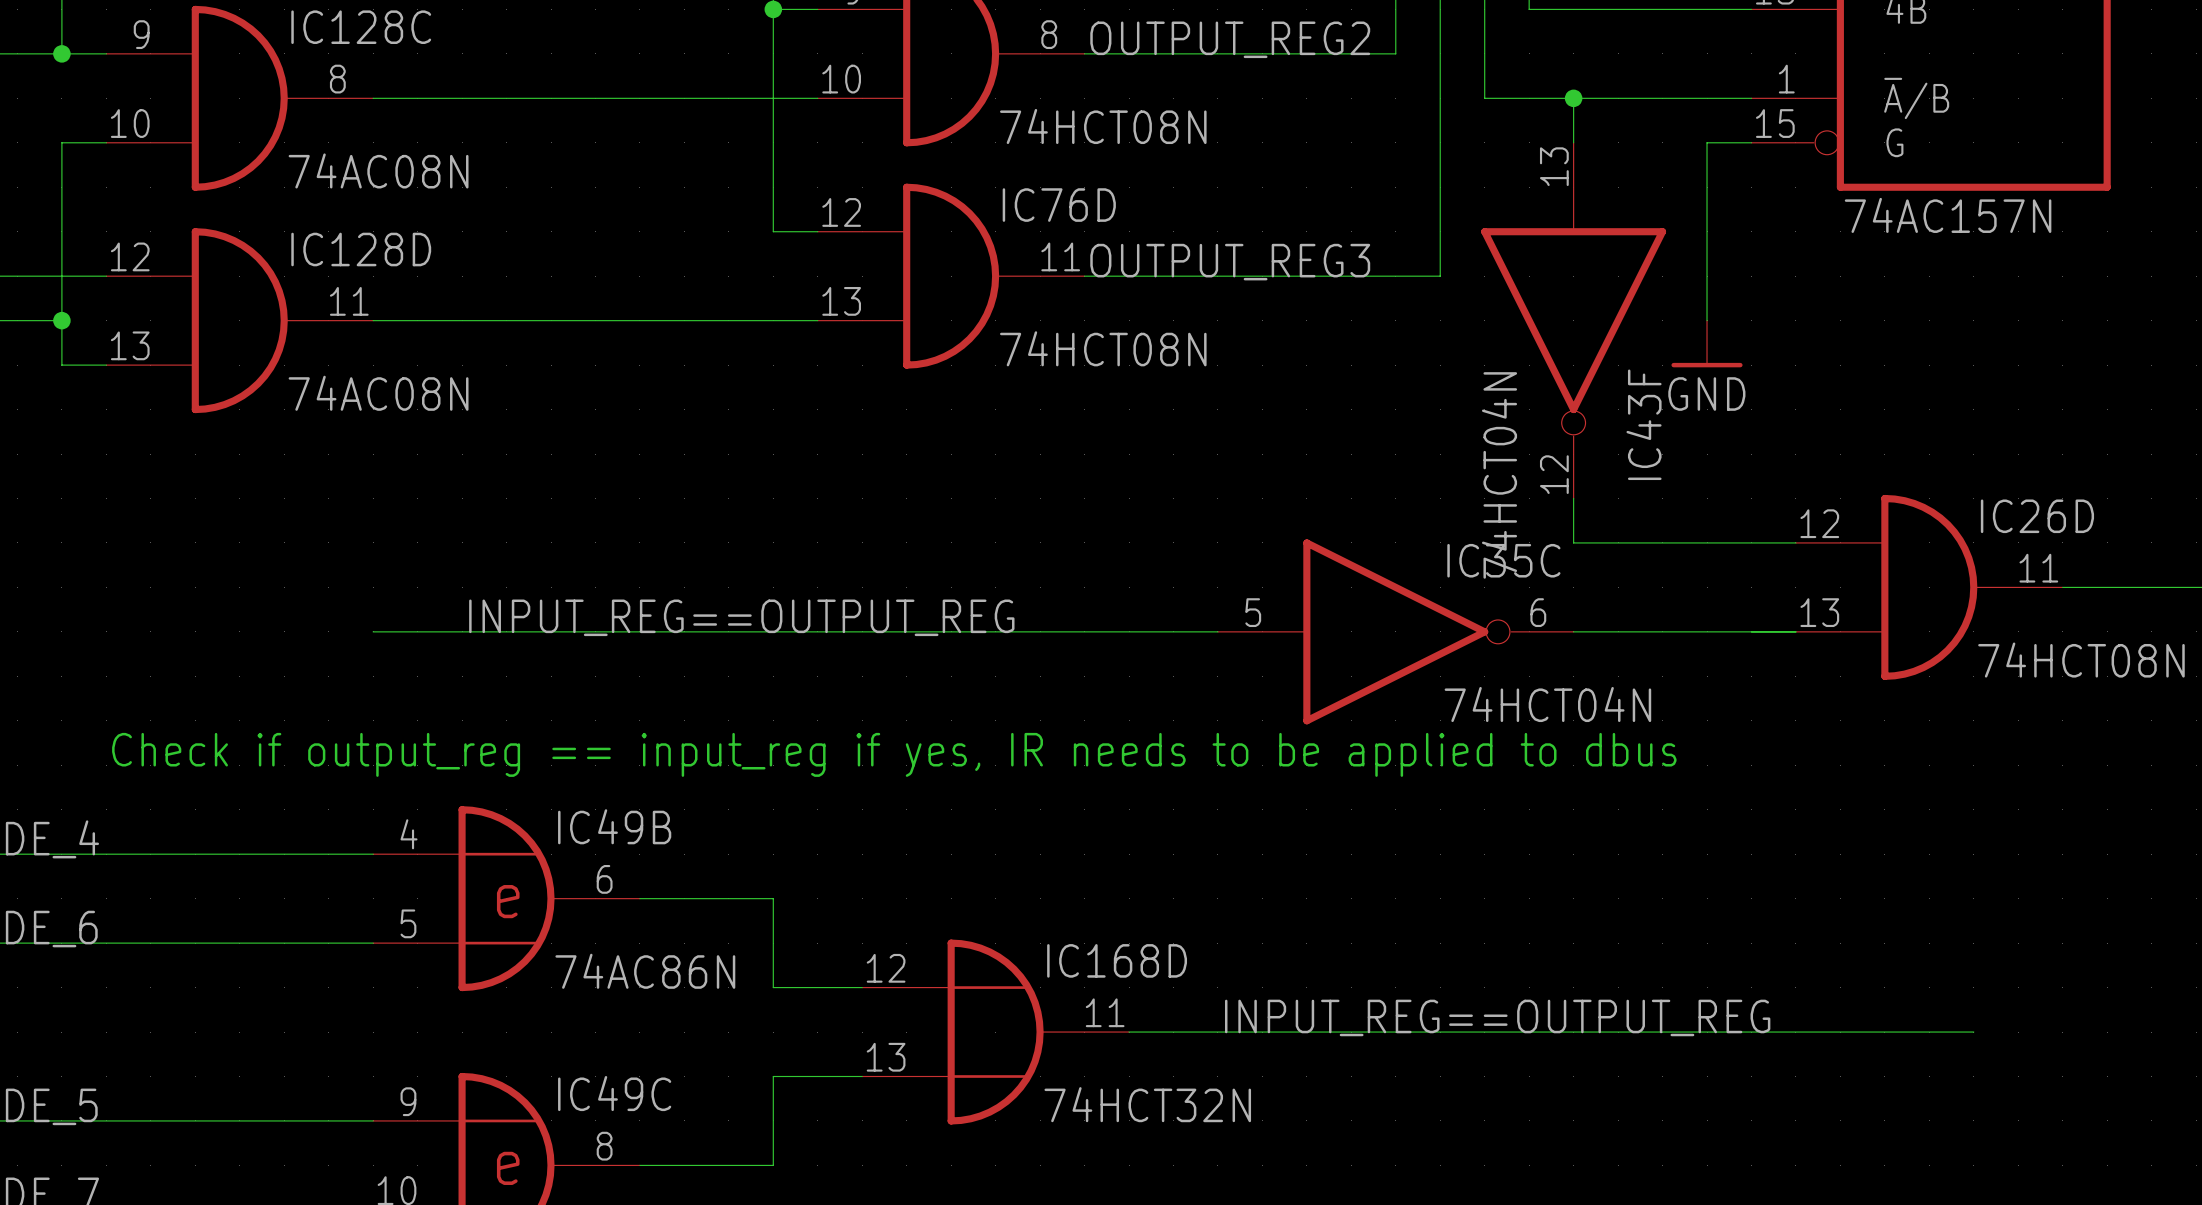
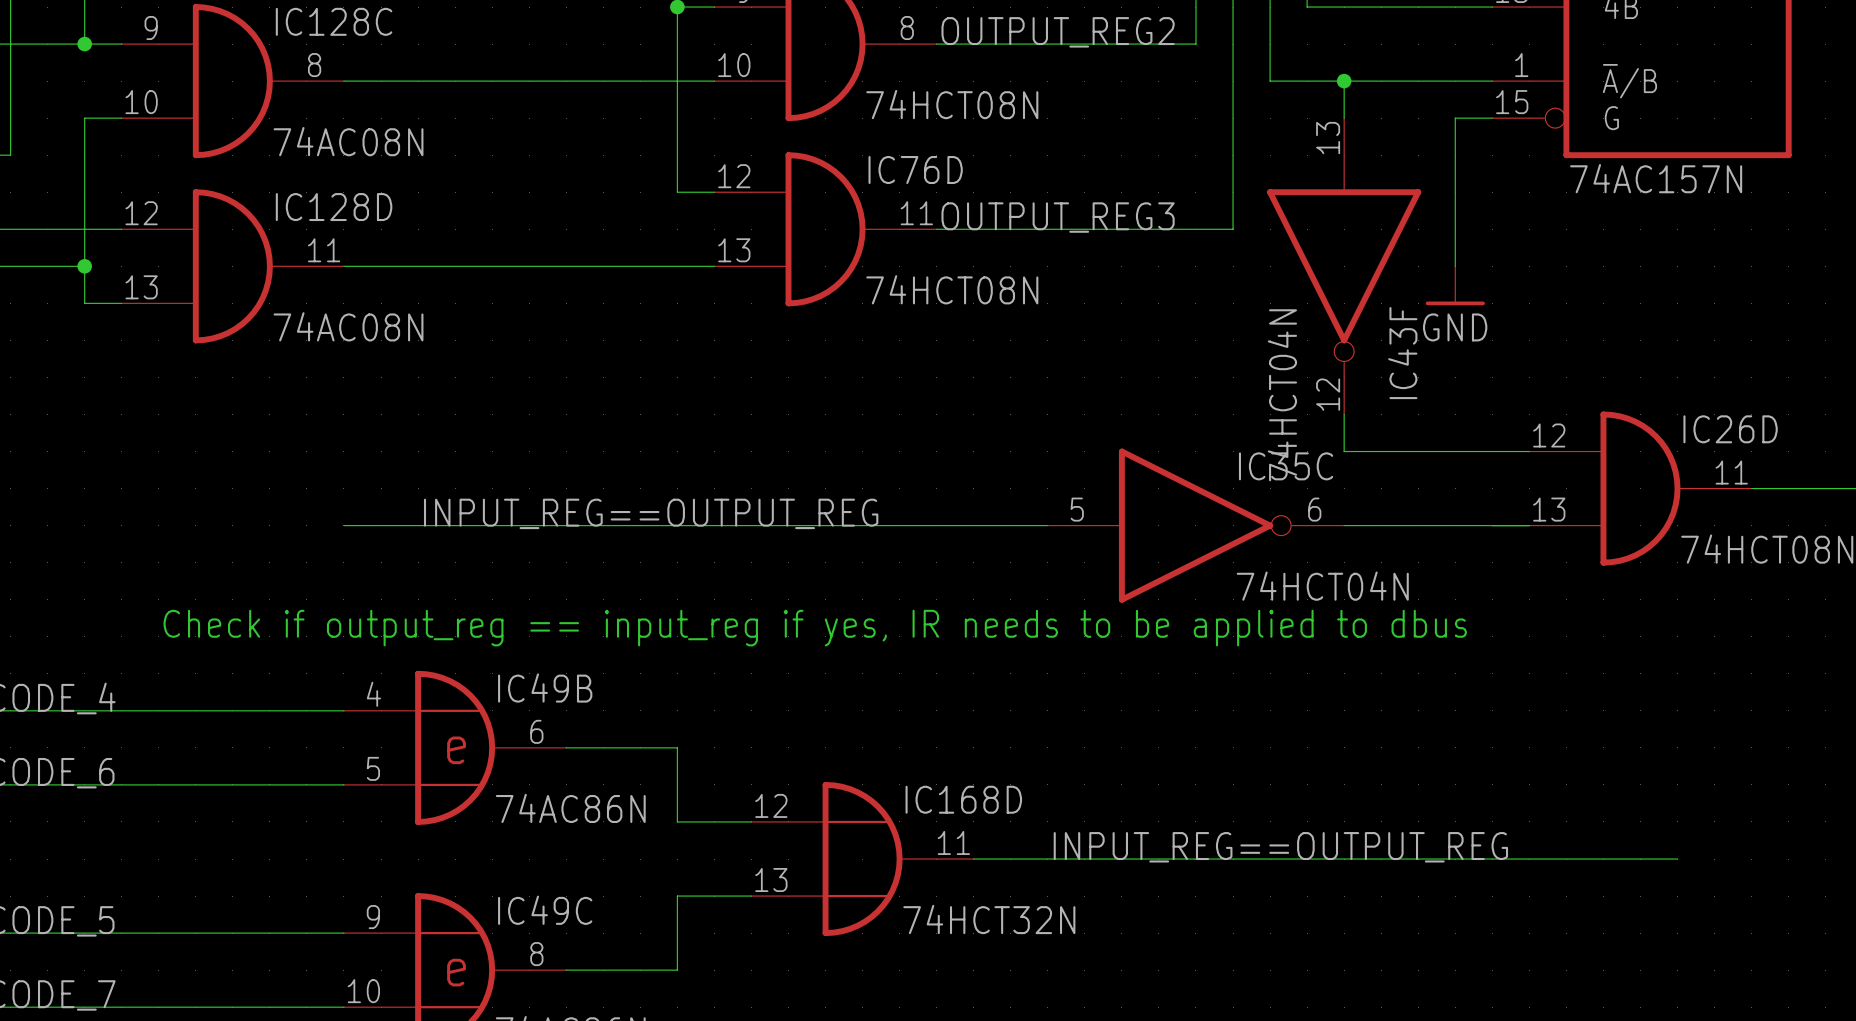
text position: Check if output_reg == input_reg if yes, IR needs to be applied to dbus (894, 754) -> Check if output_reg == input_reg if yes, IR needs to be applied to dbus (815, 628)

